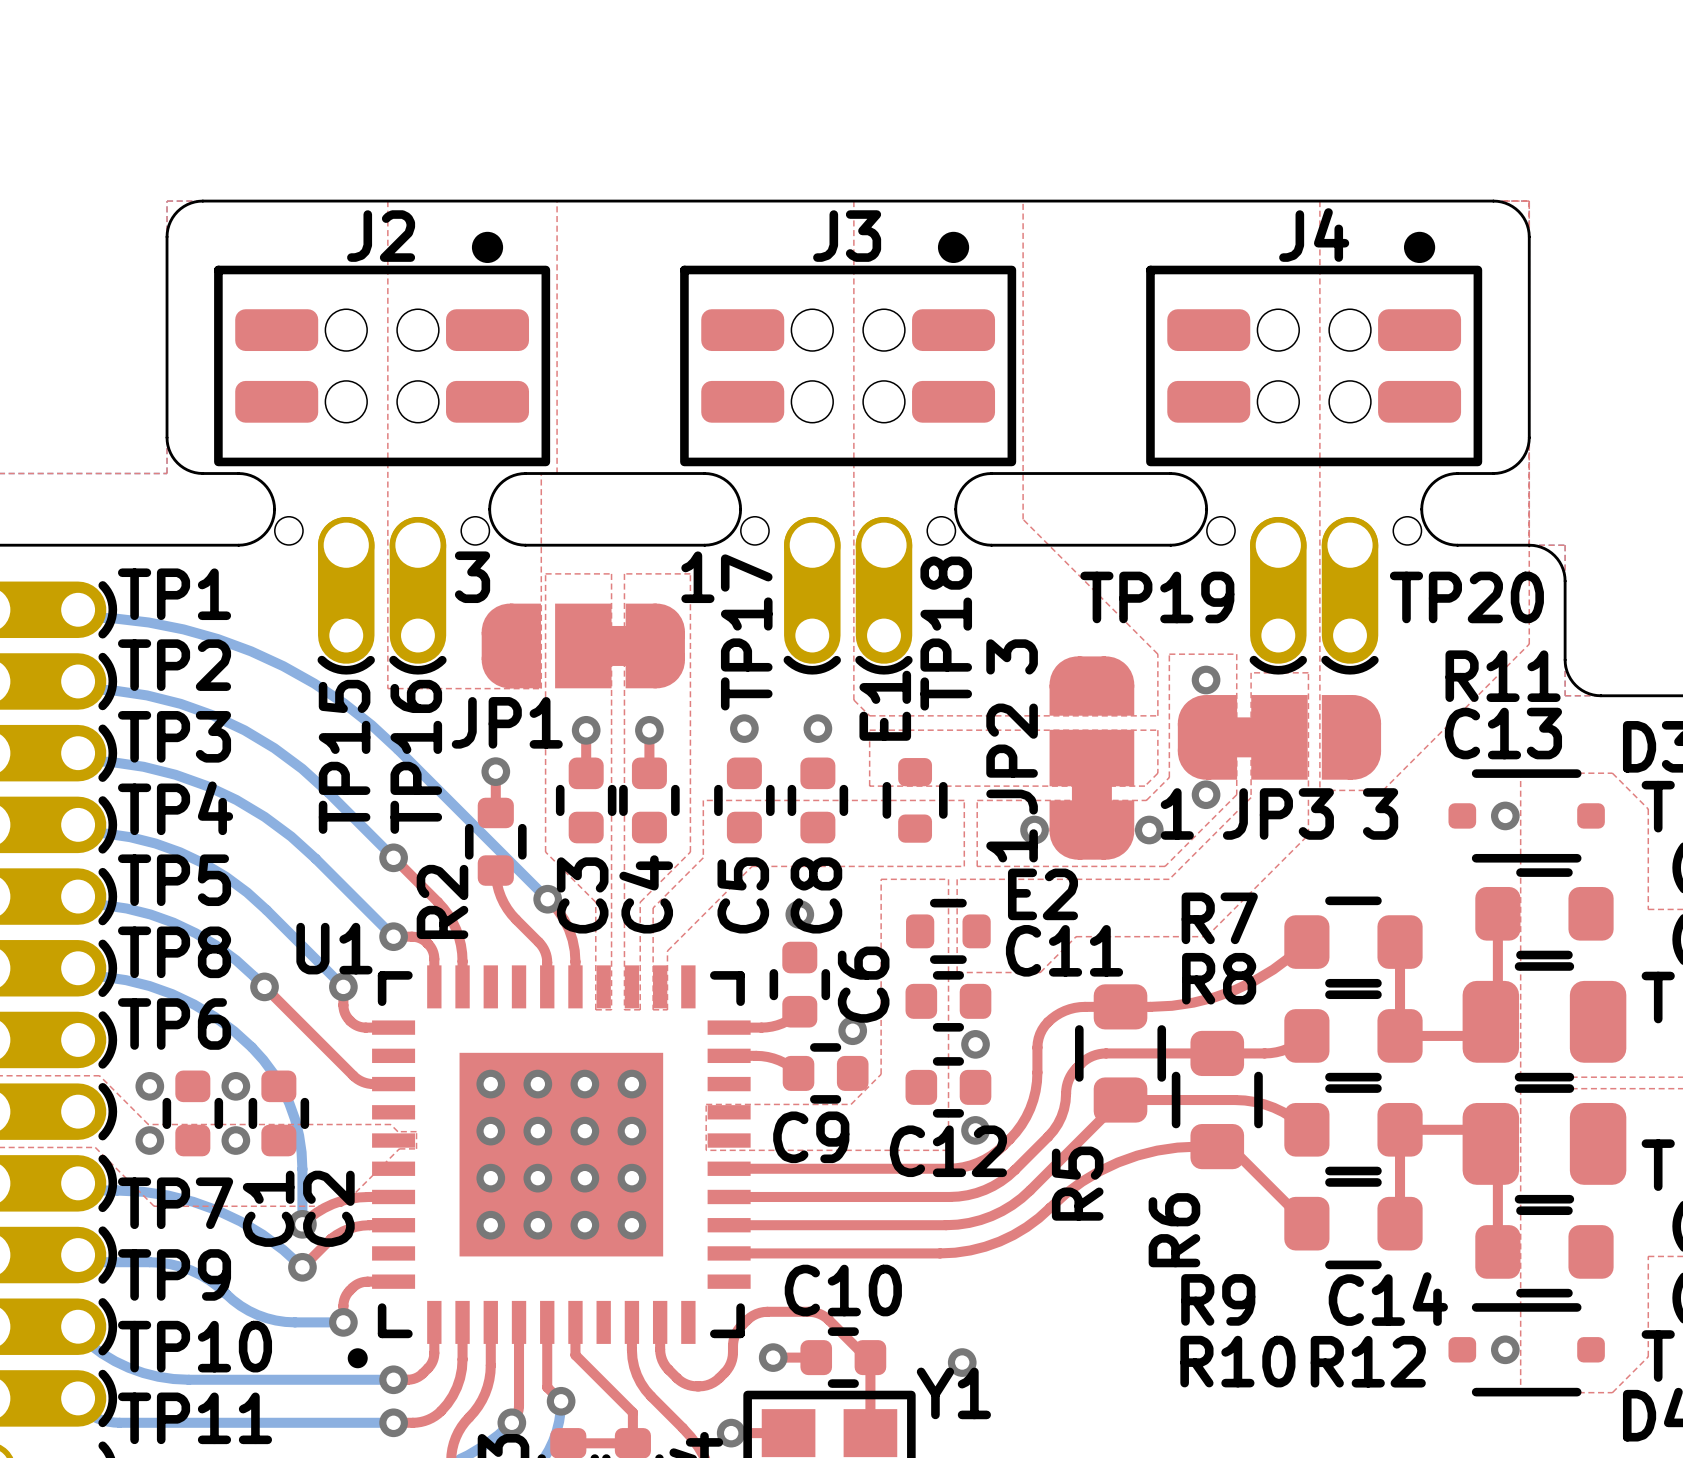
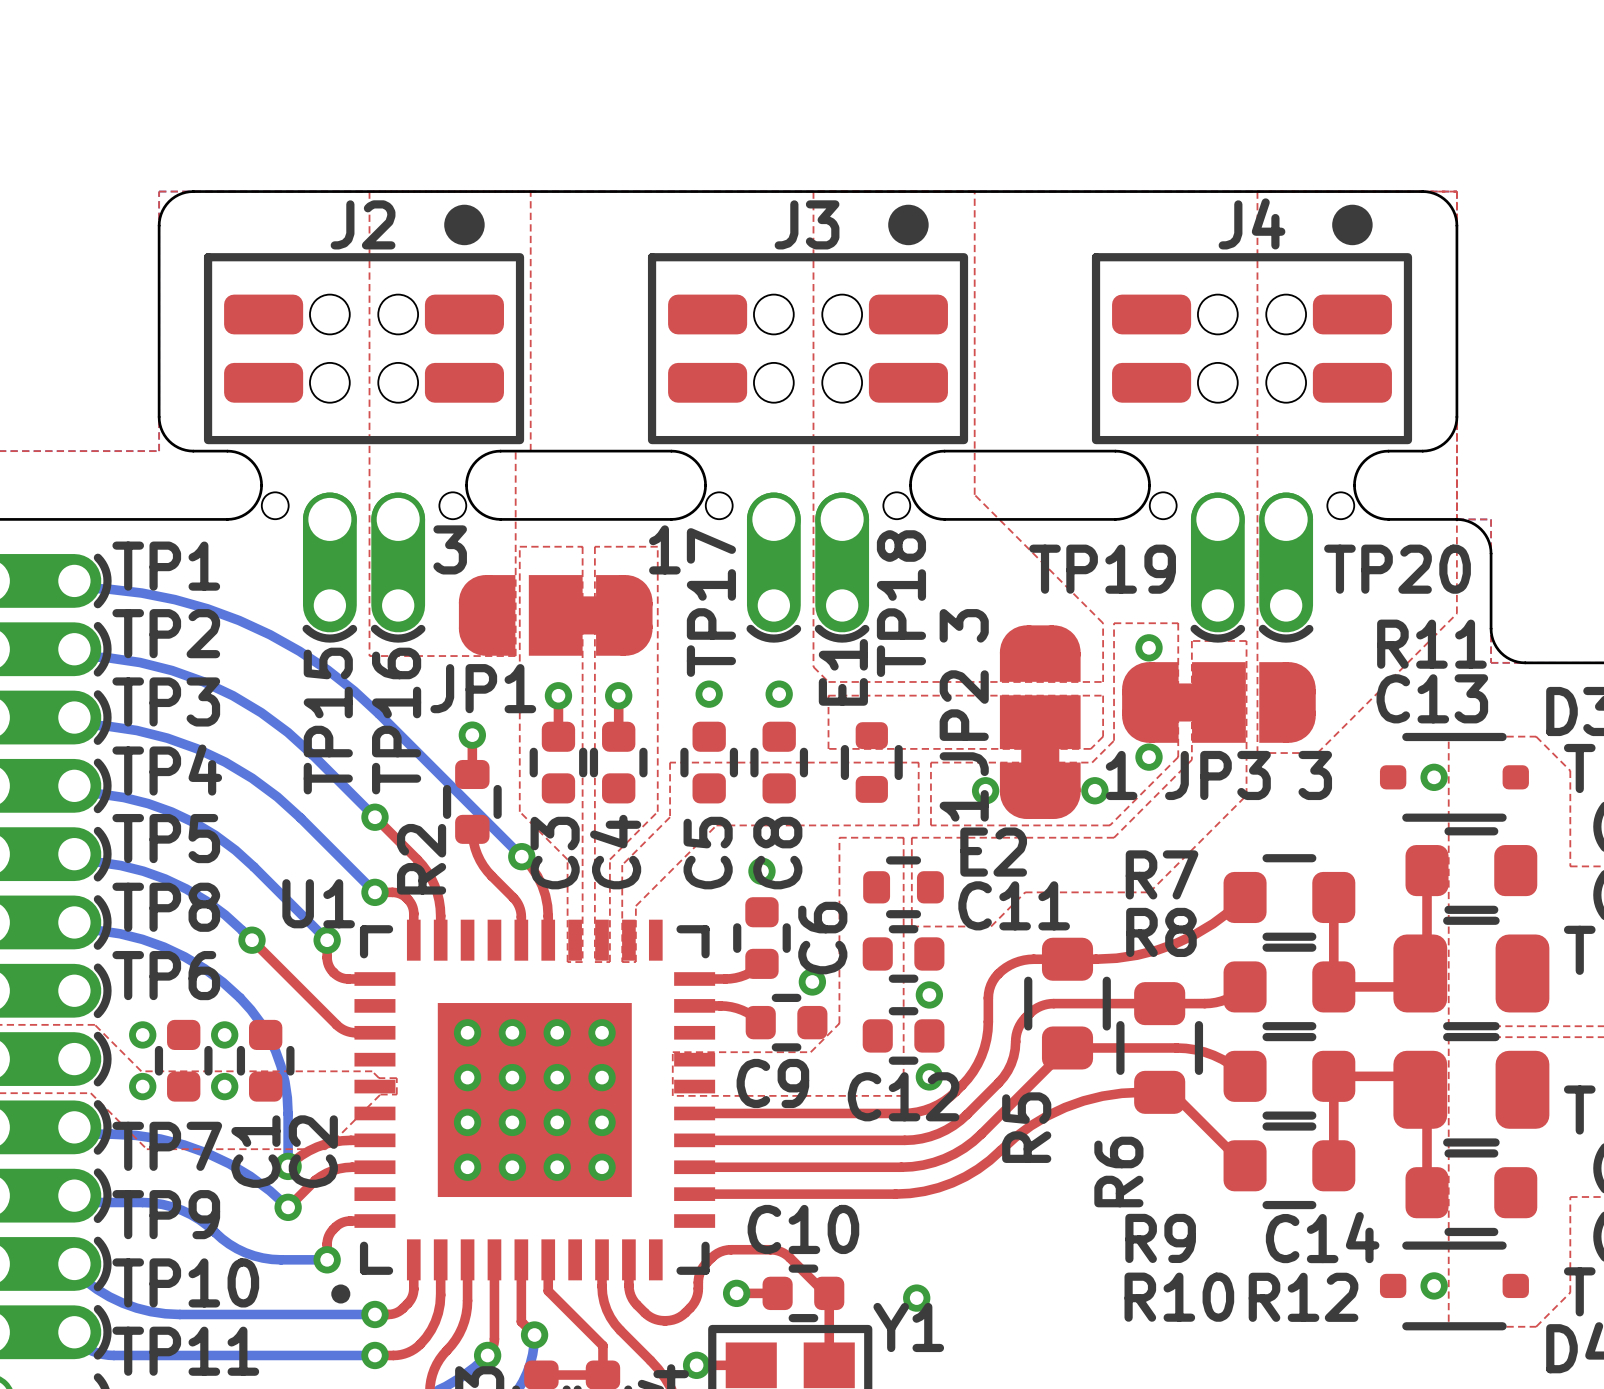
J2 footprint: [214, 231, 551, 467] -> [203, 204, 525, 445]
J3 footprint: [680, 231, 1017, 467] -> [647, 204, 969, 445]
J4 footprint: [1146, 231, 1483, 467] -> [1091, 204, 1413, 445]

